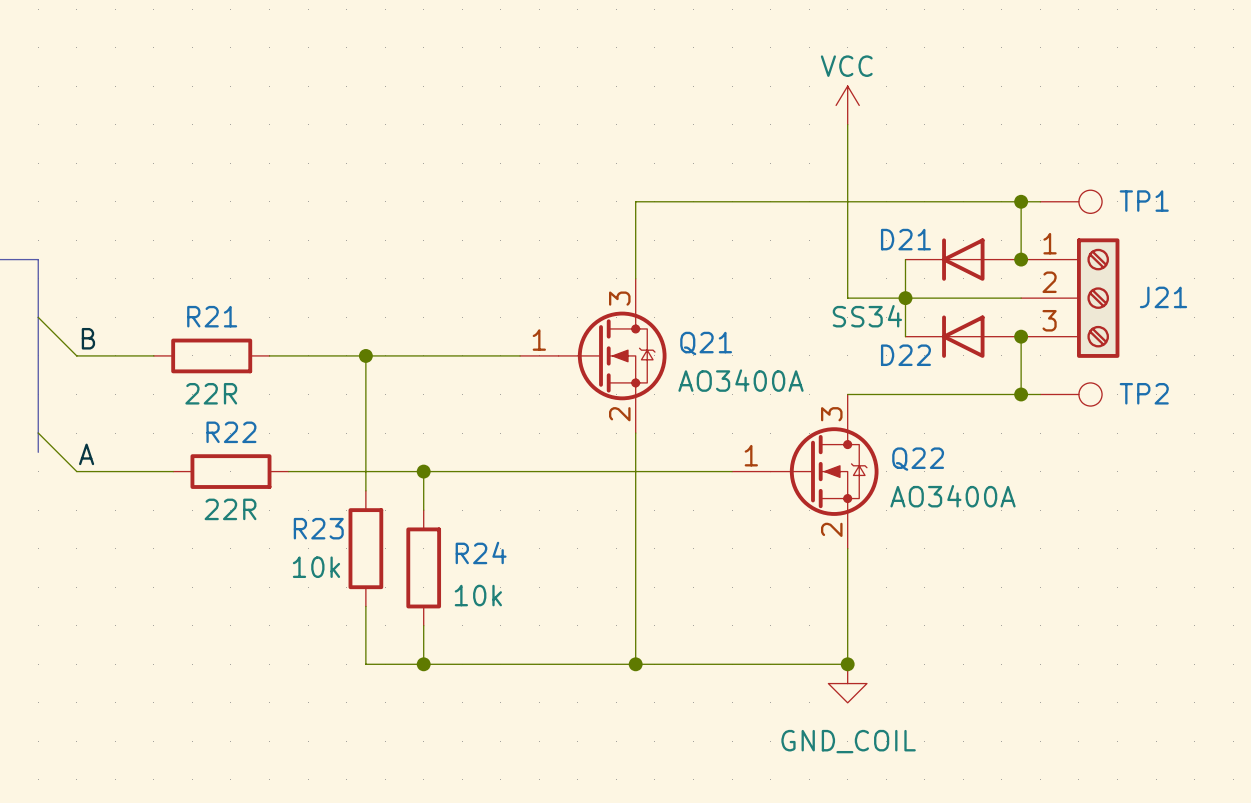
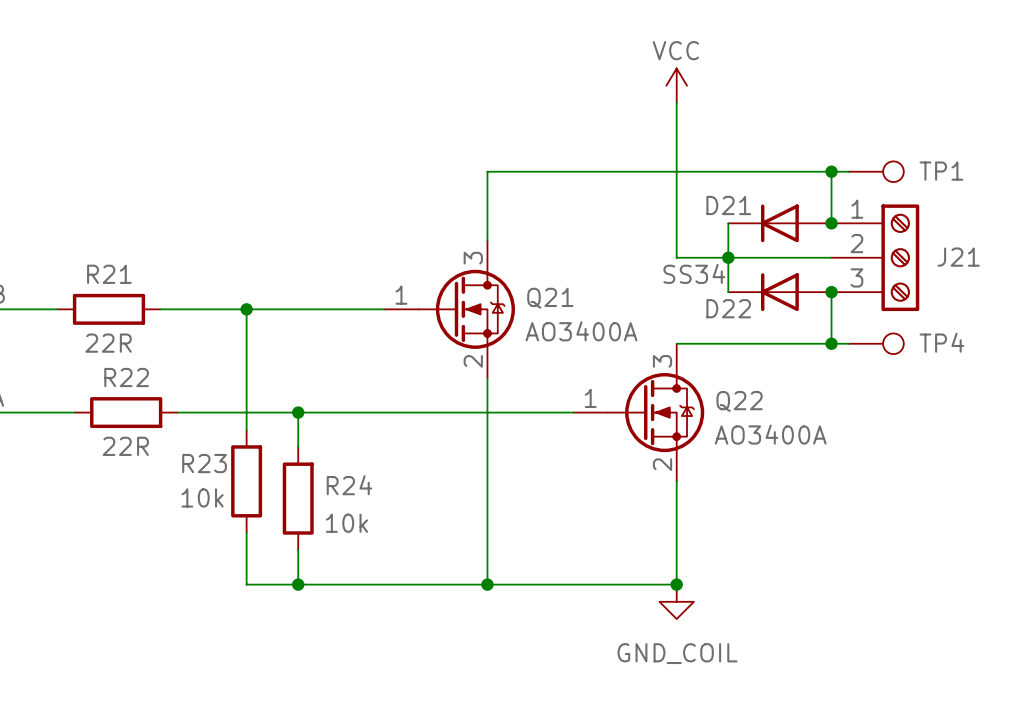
TP2 name: TP2 (1144, 393) -> TP4 (941, 342)

